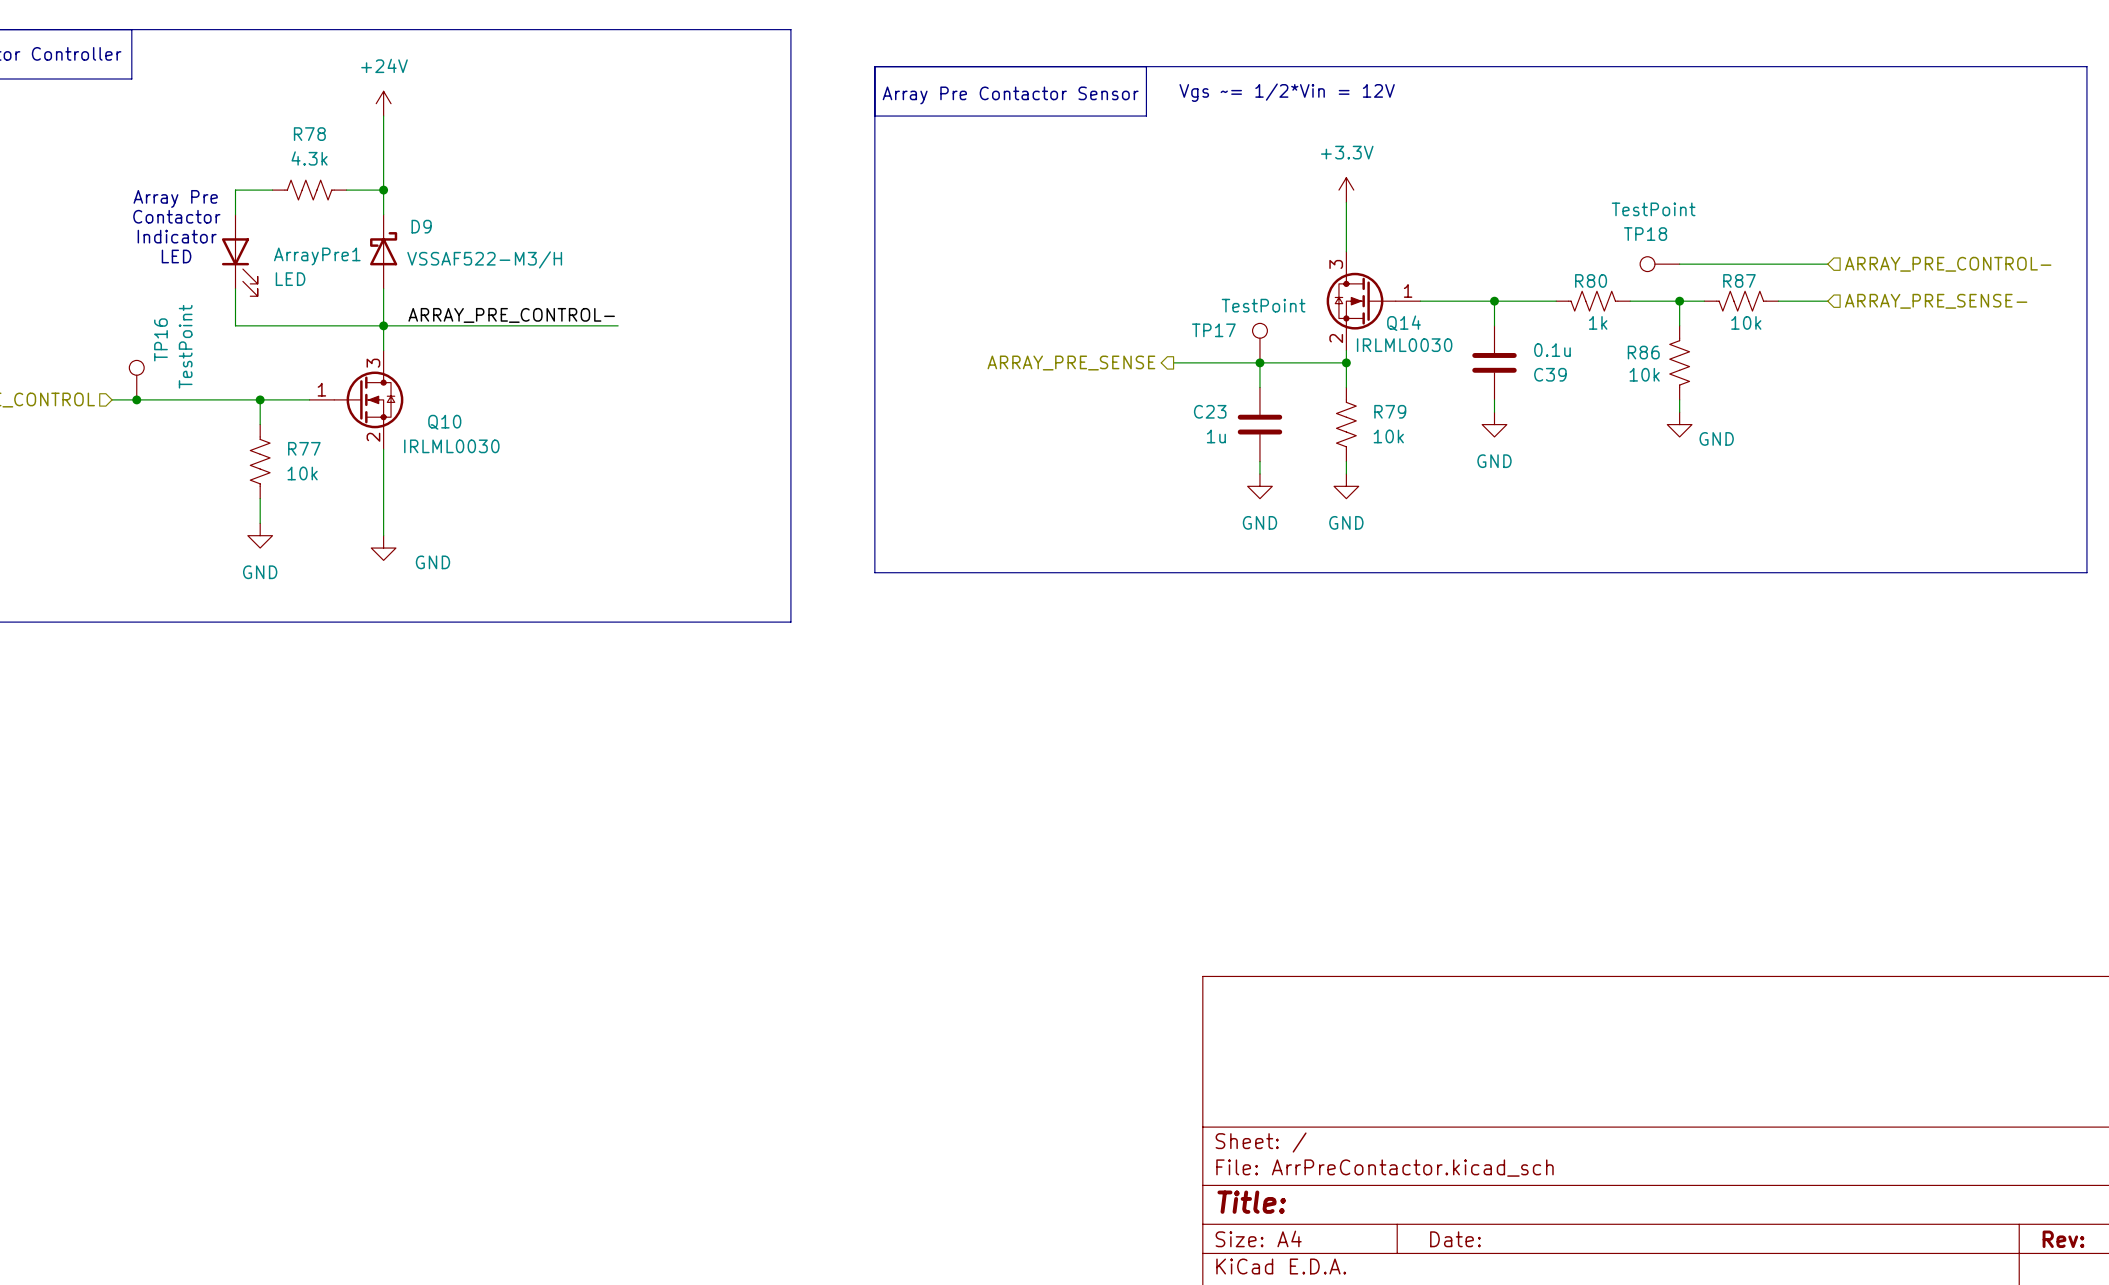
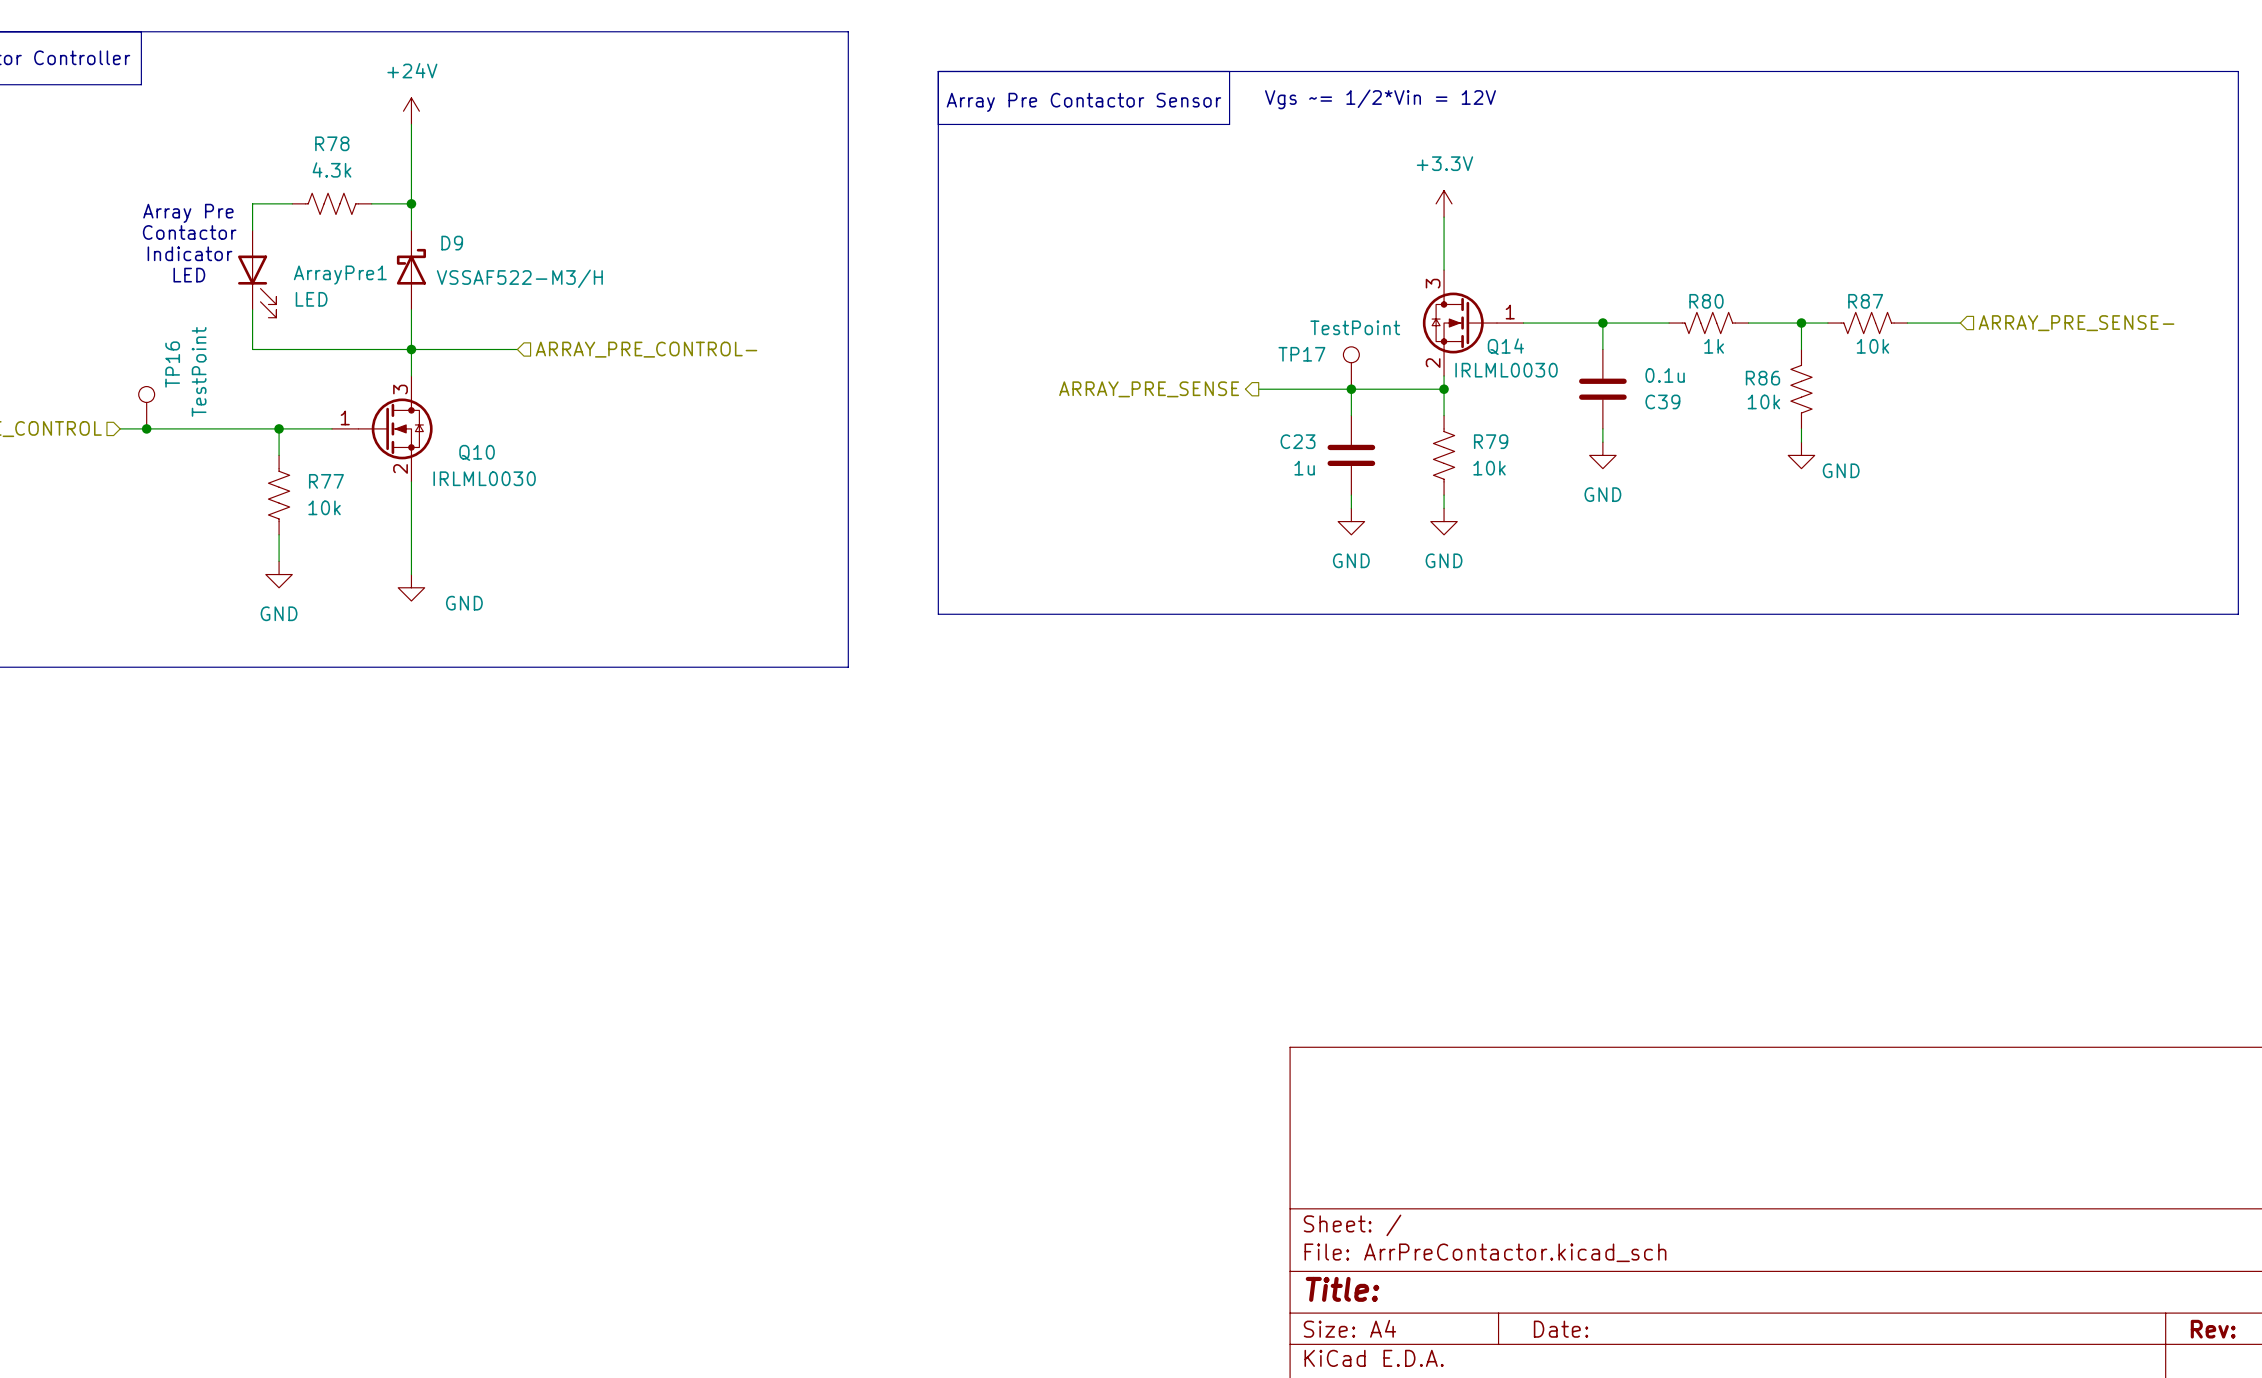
TP18: TestPoint (1659, 264) -> none
wire: (1679, 264) (1827, 264) -> none
hierarchical label: ARRAY_PRE_CONTROL- (1948, 264) -> none
label: ARRAY_PRE_CONTROL- (511, 315) -> none
wire: (482, 325) (618, 325) -> none
hierarchical label: none -> ARRAY_PRE_CONTROL- (646, 349)

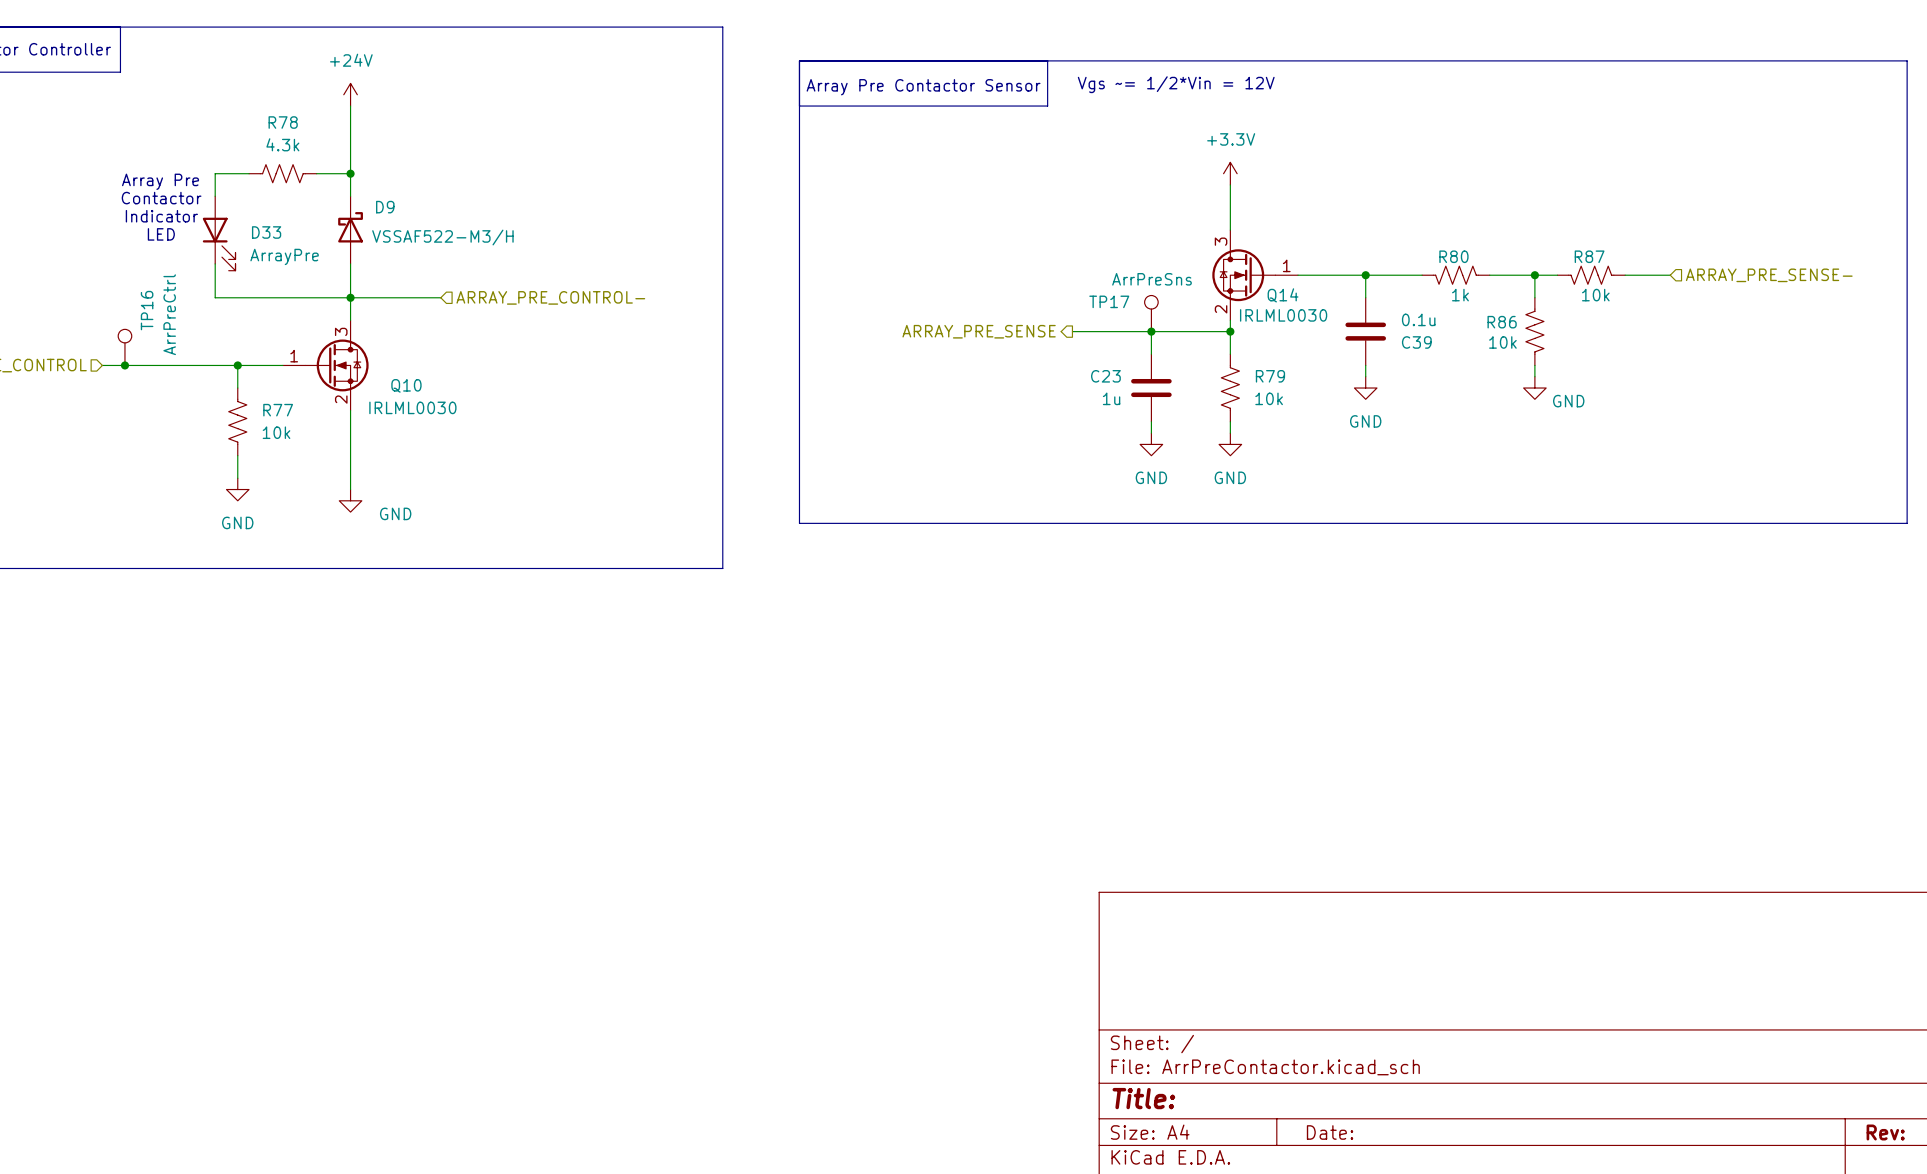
ArrayPre1 name: ArrayPre1 (340, 275) -> D33 (266, 232)
ArrayPre1 value: LED (311, 299) -> ArrayPre (284, 256)
TP17 value: TestPoint (1355, 327) -> ArrPreSns (1152, 279)
TP16 value: TestPoint (199, 371) -> ArrPreCtrl (169, 314)

